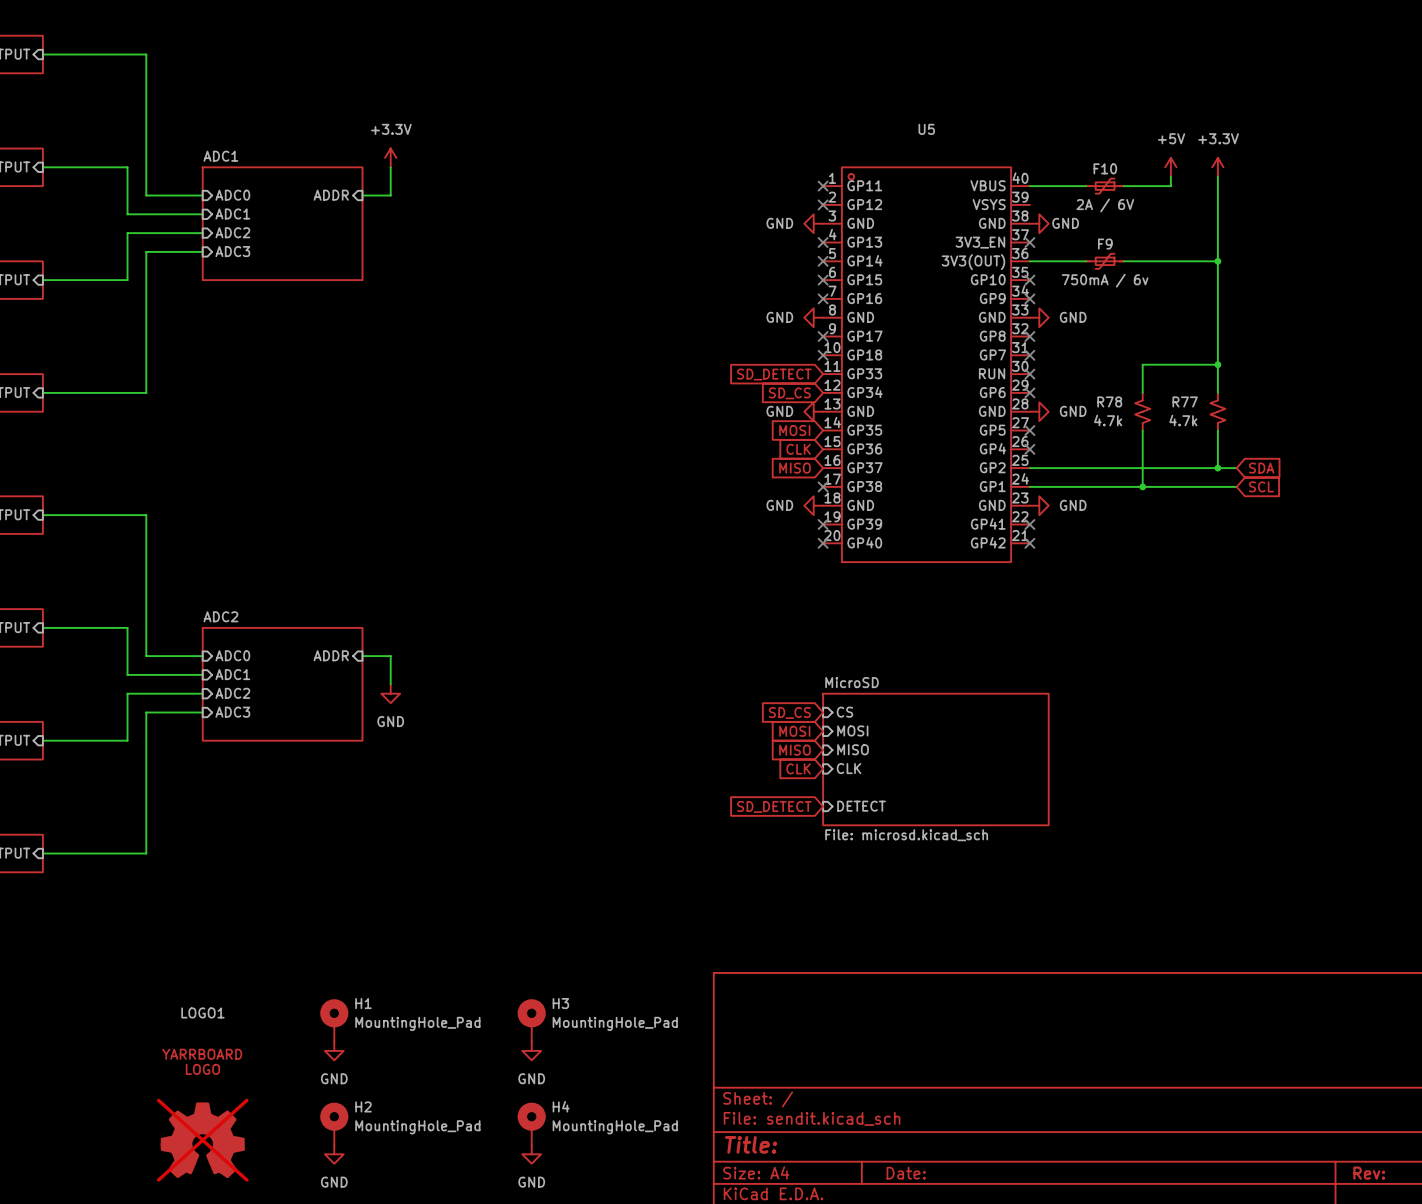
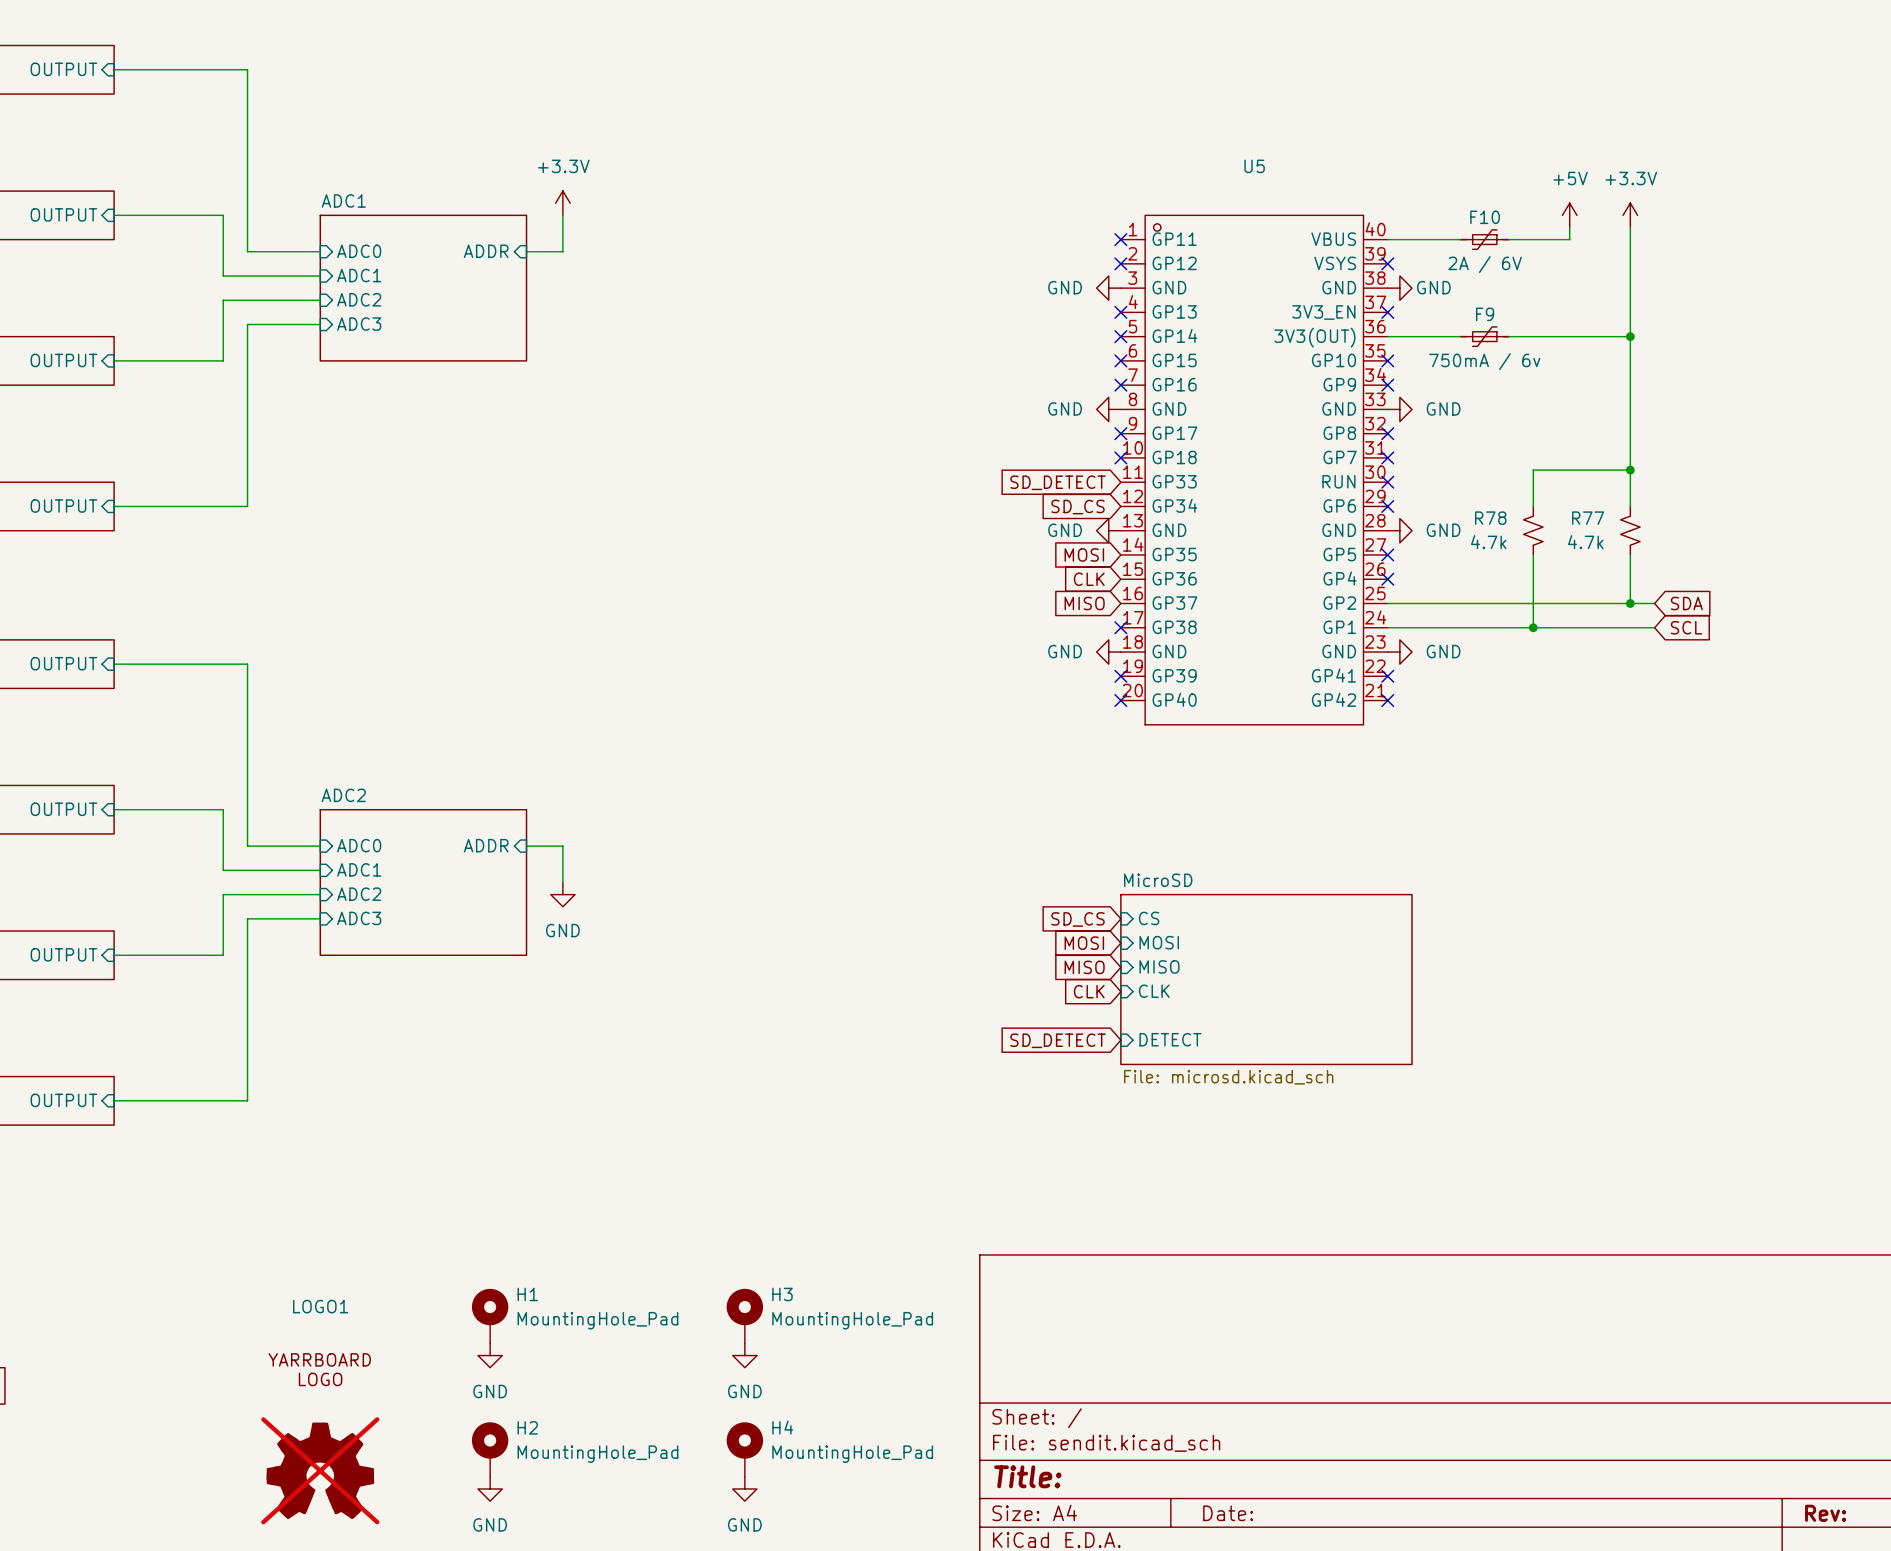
no-connect mark: none -> (1387, 263)

